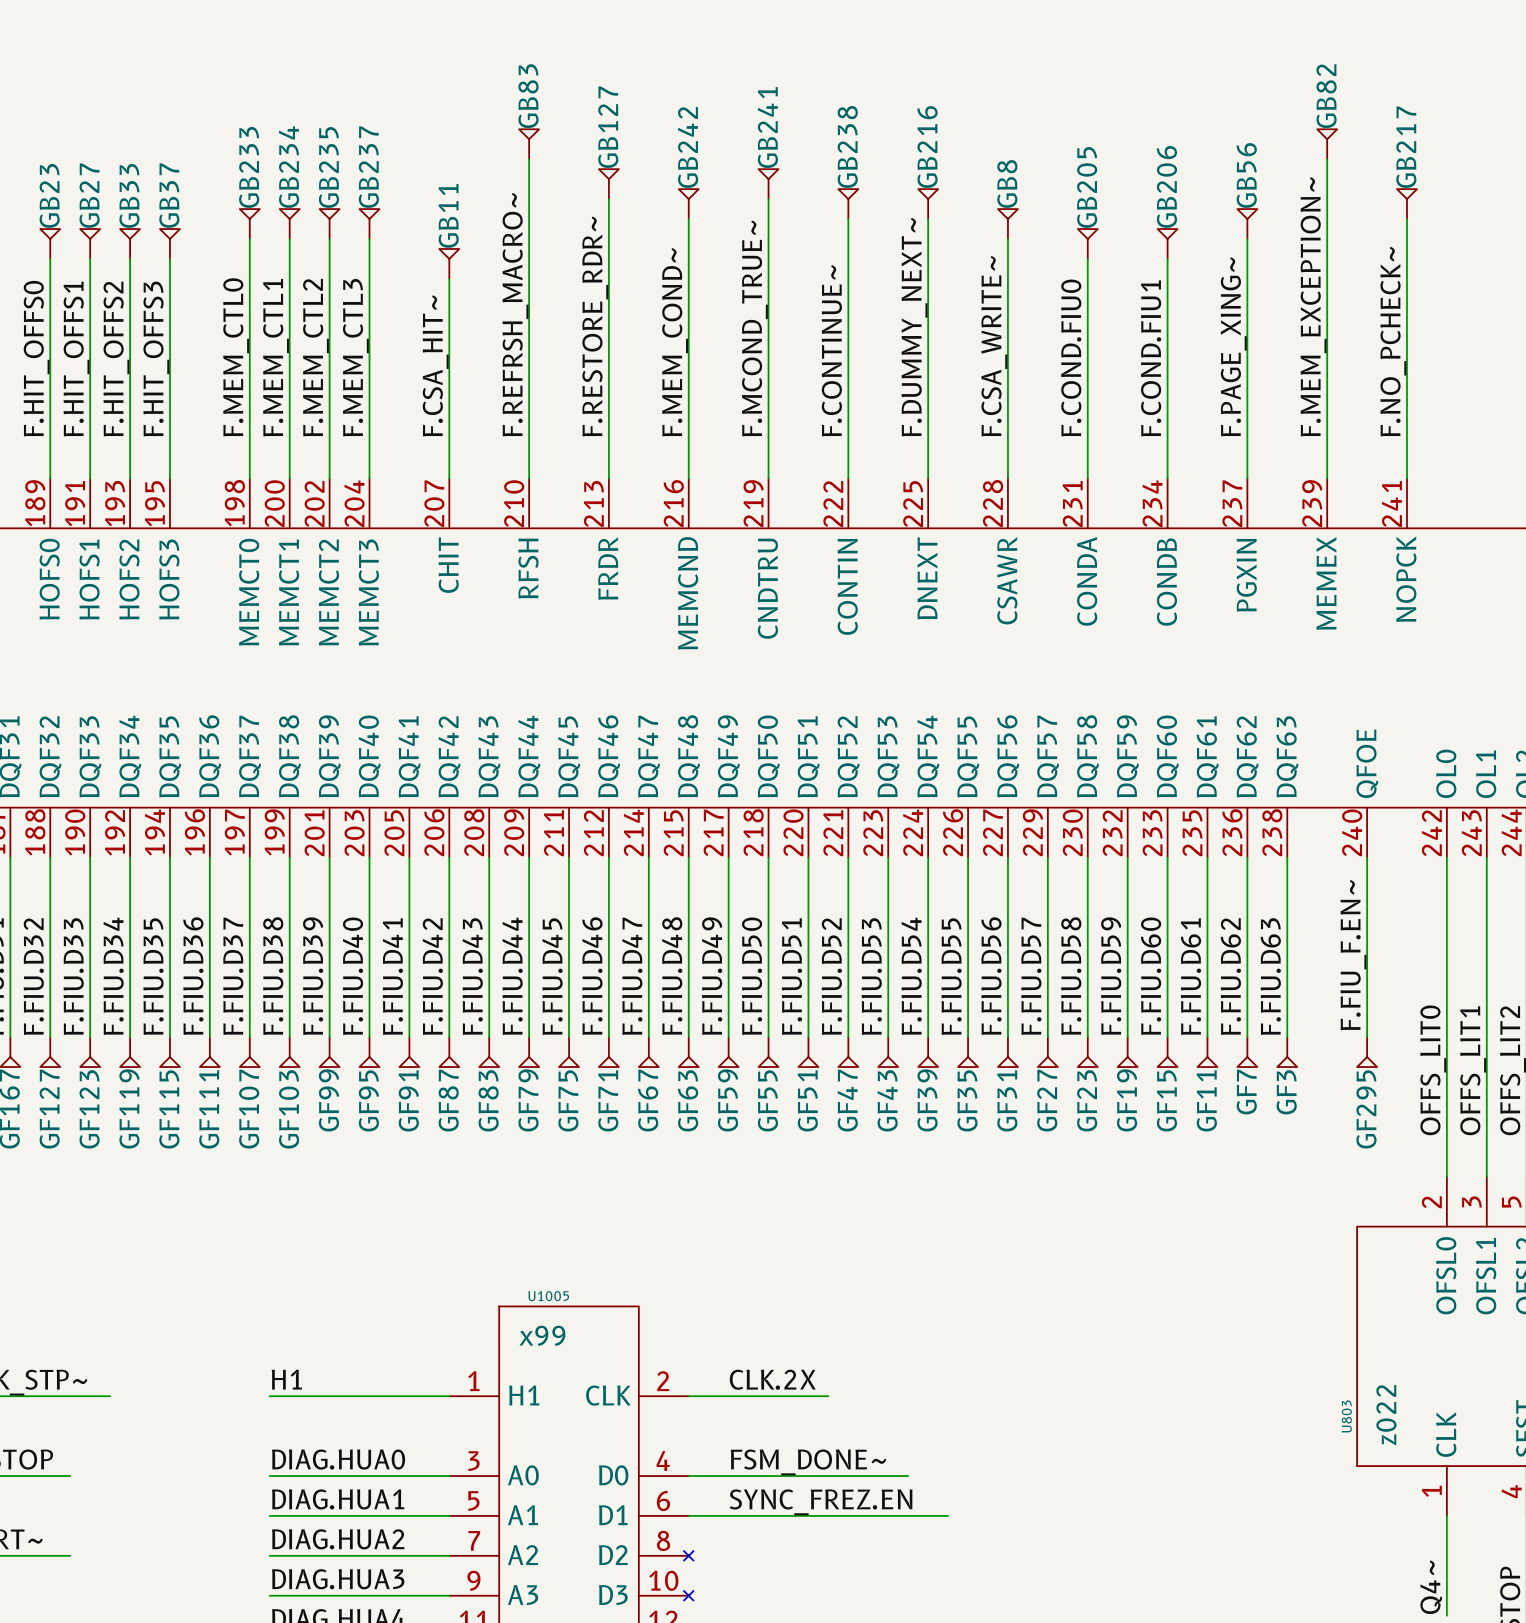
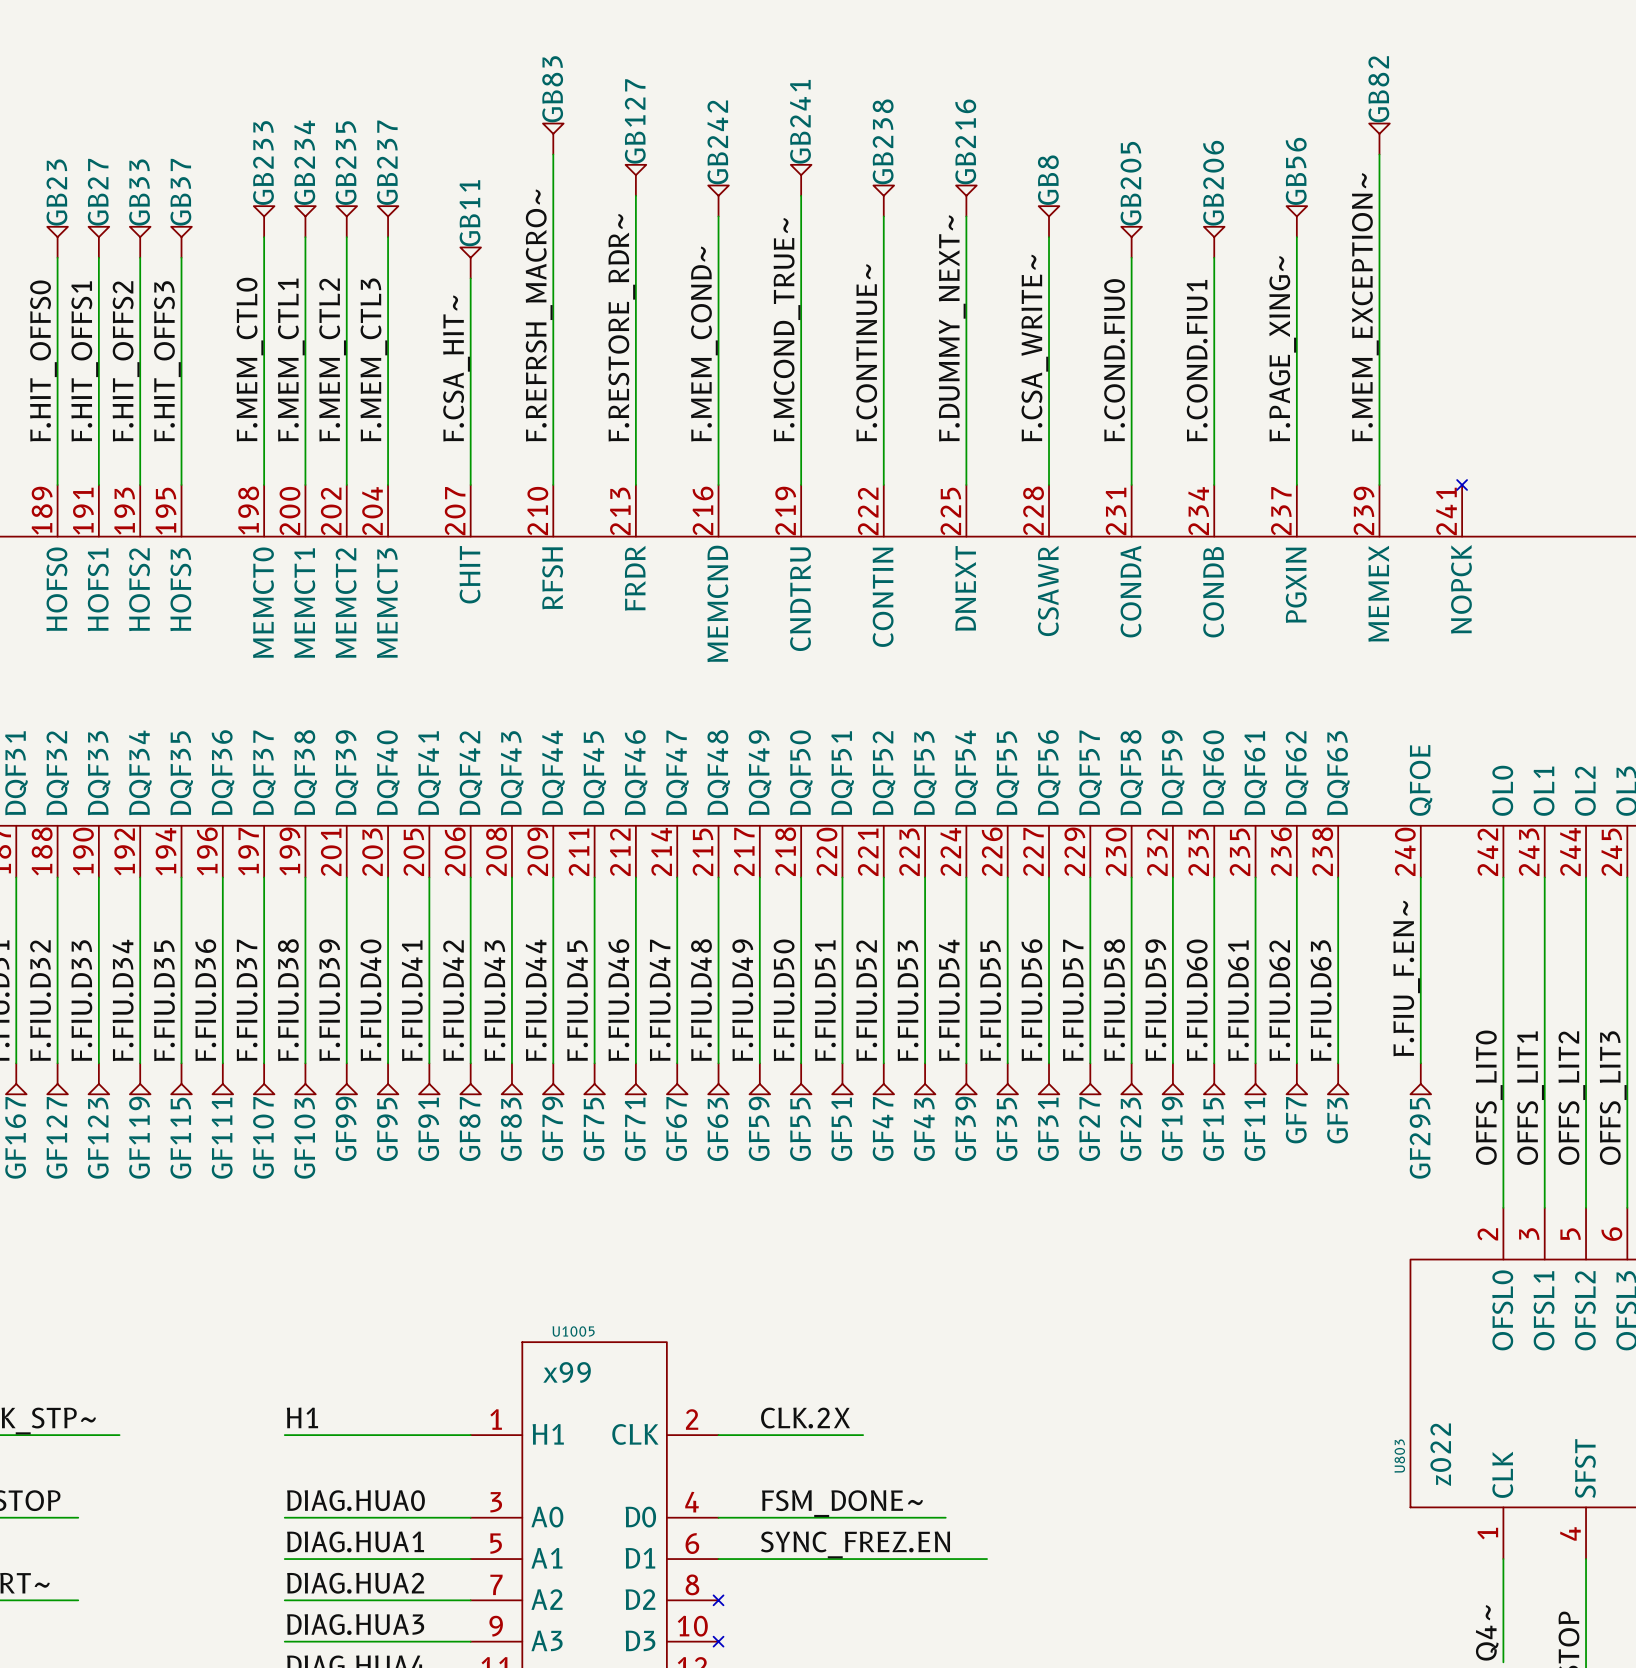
GB217: (1407, 203) -> none
wire: (1407, 219) (1407, 478) -> none
label: F.NO_PCHECK~ (1393, 341) -> none
no-connect mark: none -> (1462, 484)

